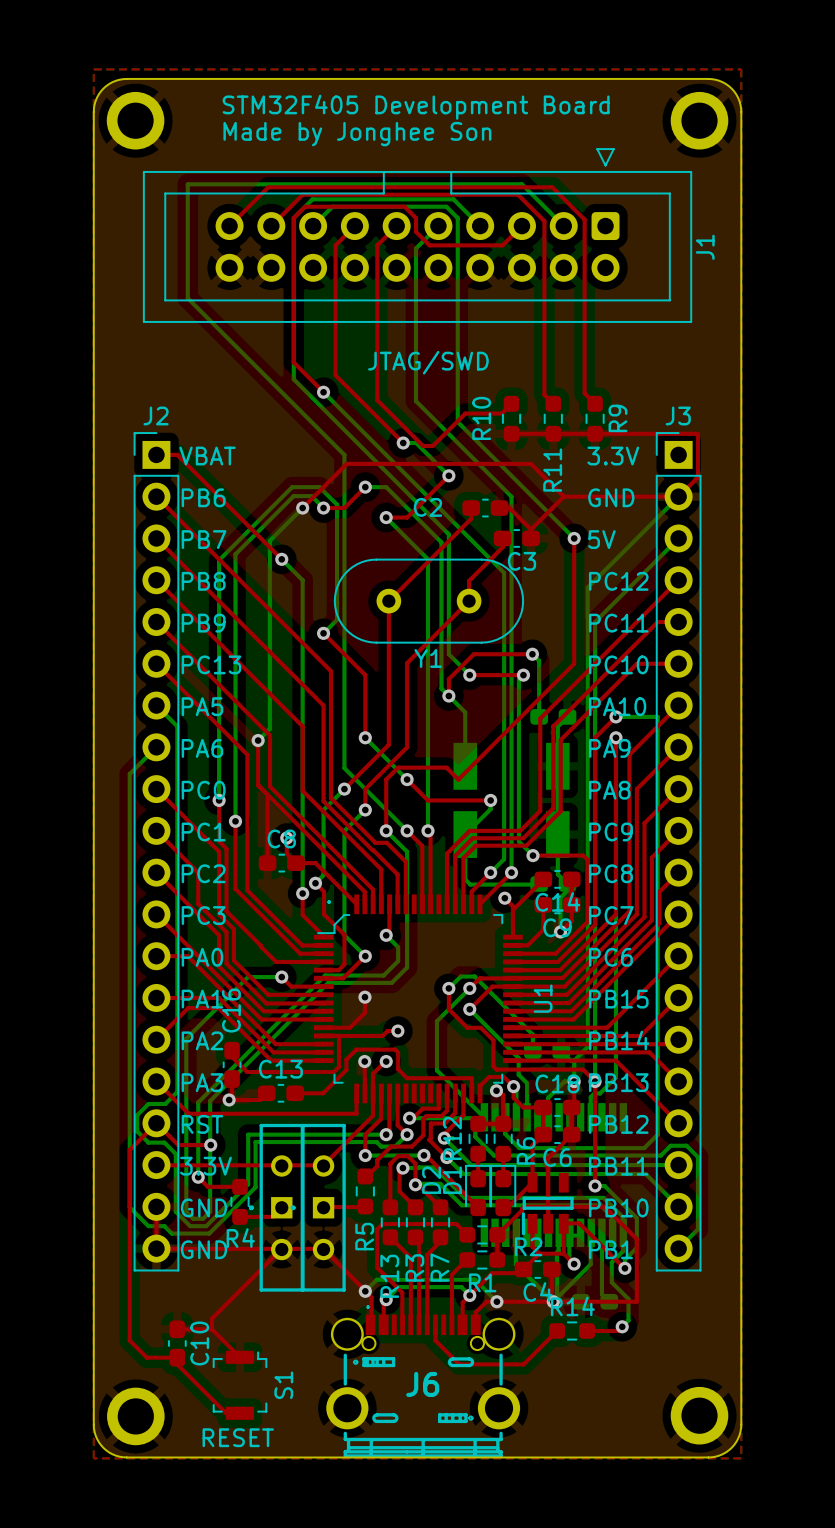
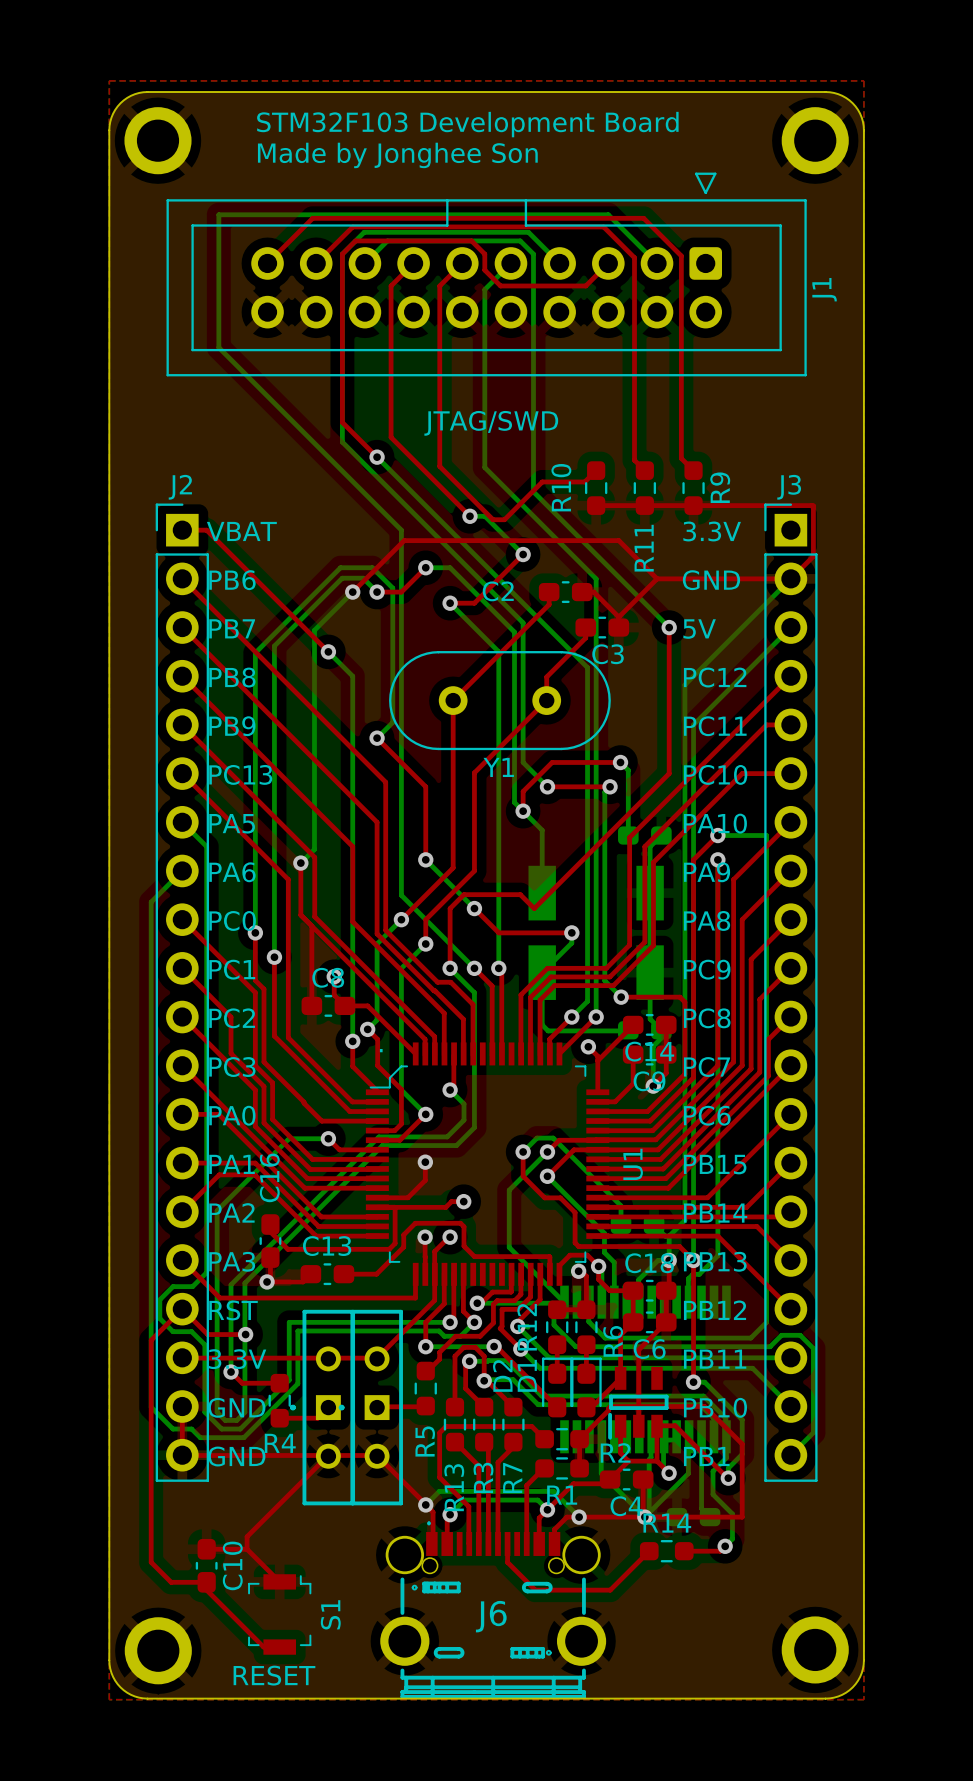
text: STM32F405 Development Board (416, 107) -> STM32F103 Development Board (467, 124)

